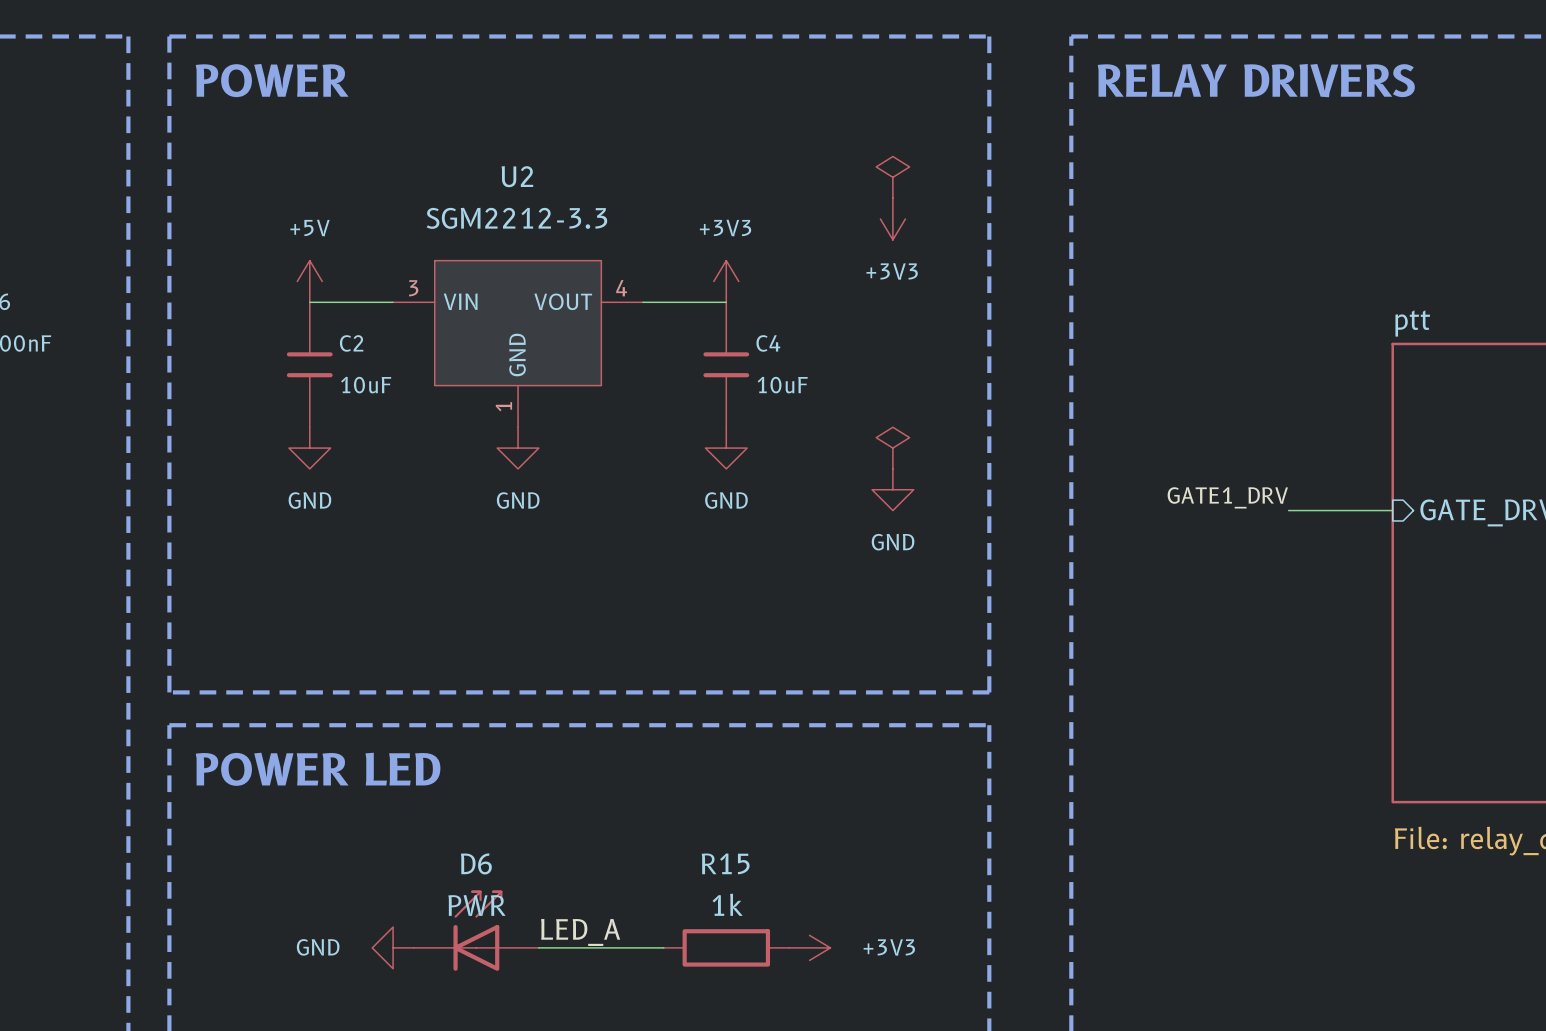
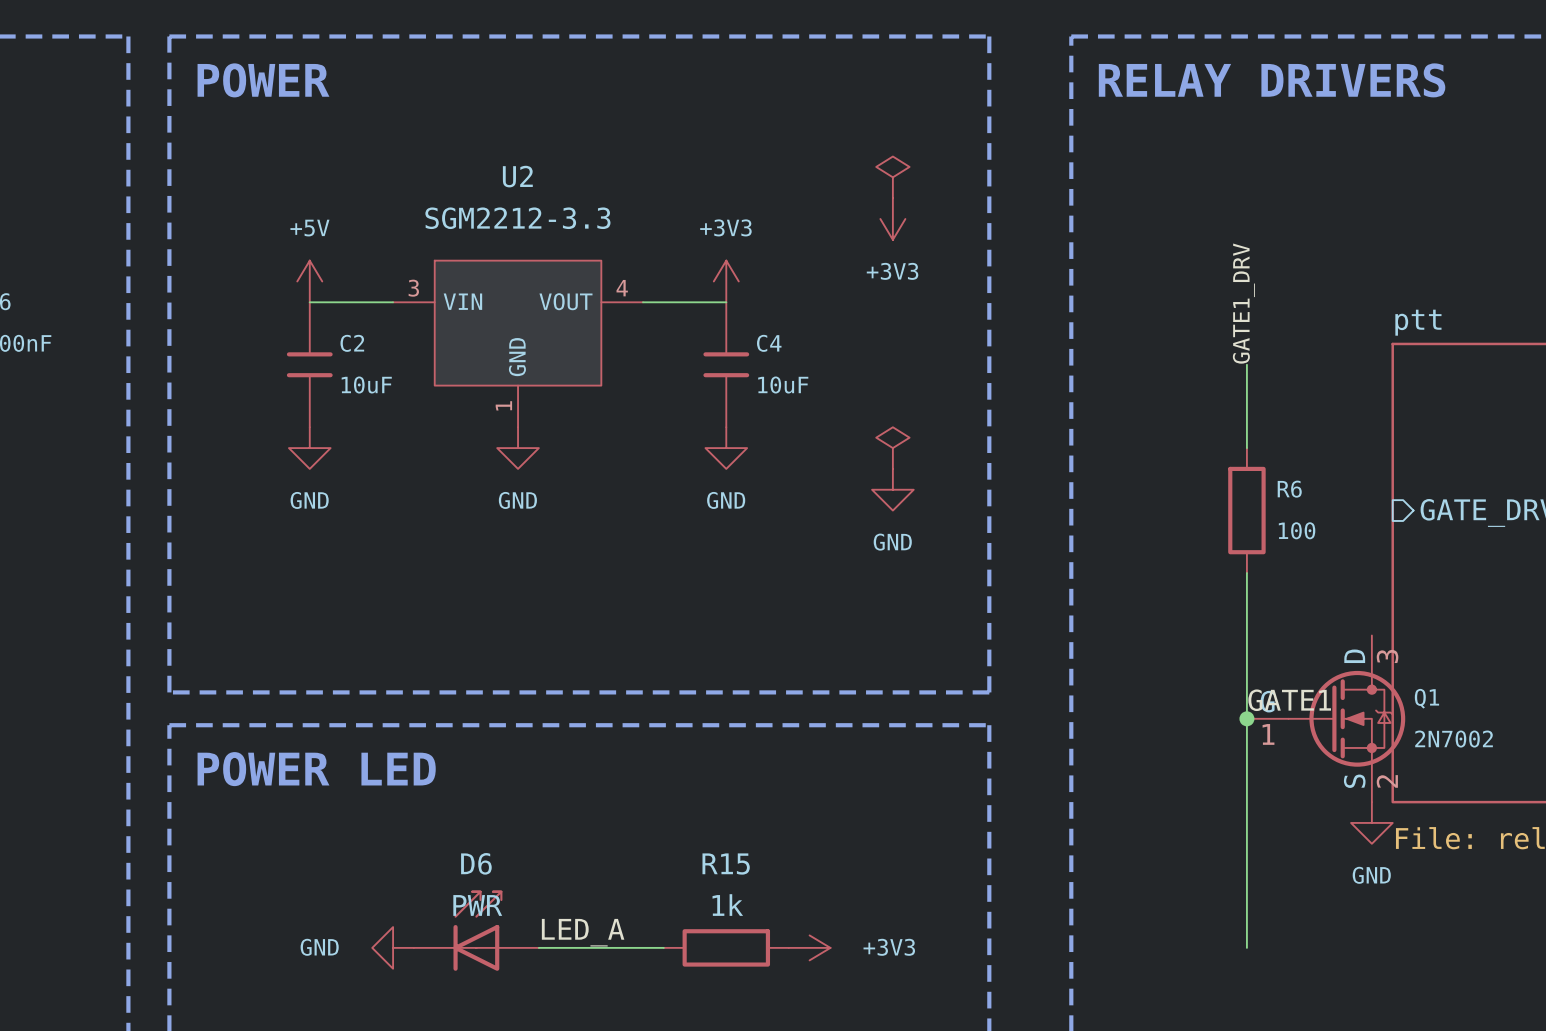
wire: none -> (1246, 364) (1246, 448)
label rotation: 0° (1227, 497) -> 90° counterclockwise (1243, 303)
label position: GATE1_DRV (1227, 497) -> GATE1_DRV (1243, 303)
R6: none -> 100 (1246, 510)
wire: (1288, 510) (1392, 510) -> none
wire: none -> (1246, 573) (1246, 947)
label: none -> GATE1 (1289, 700)
junction: none -> (1246, 718)
Q1: none -> 2N7002 (1326, 718)
power symbol: none -> GND (1371, 822)

